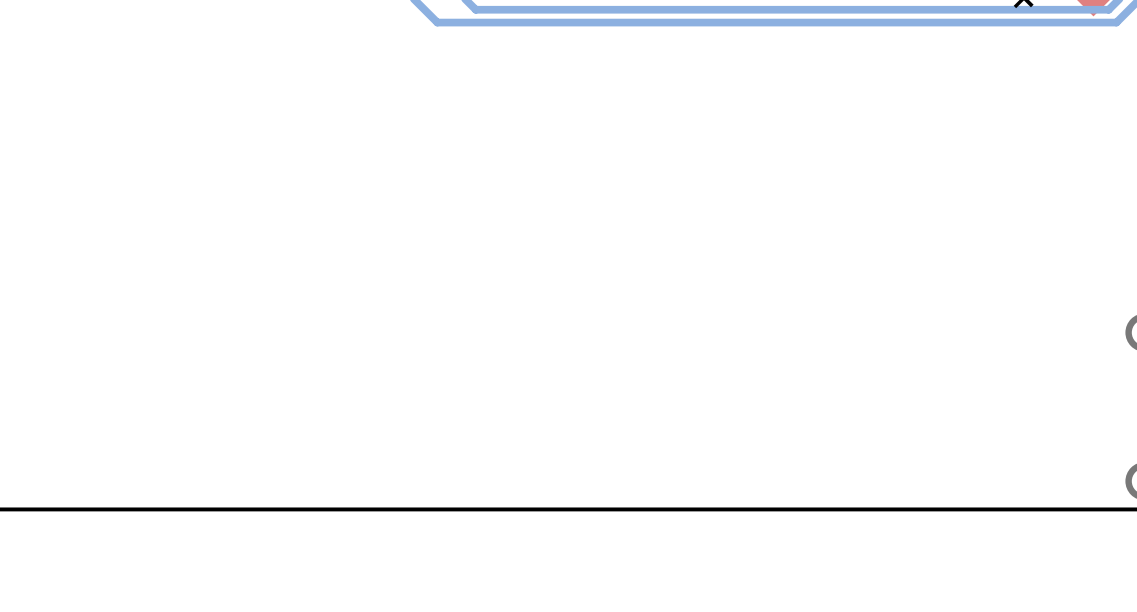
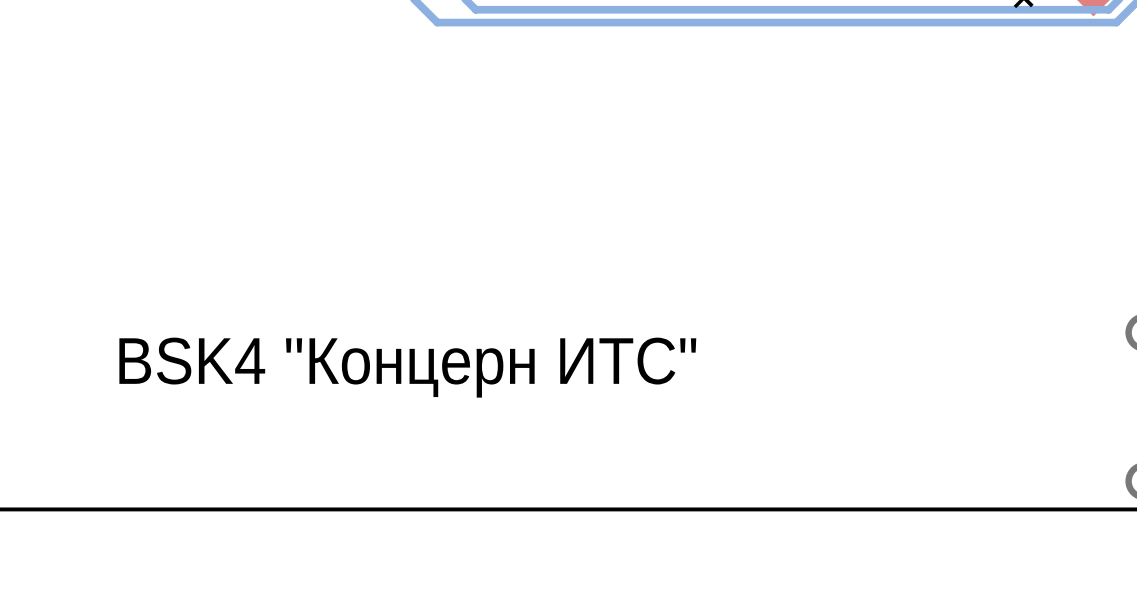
text: none -> BSK4 "Концерн ИТС" (407, 367)

